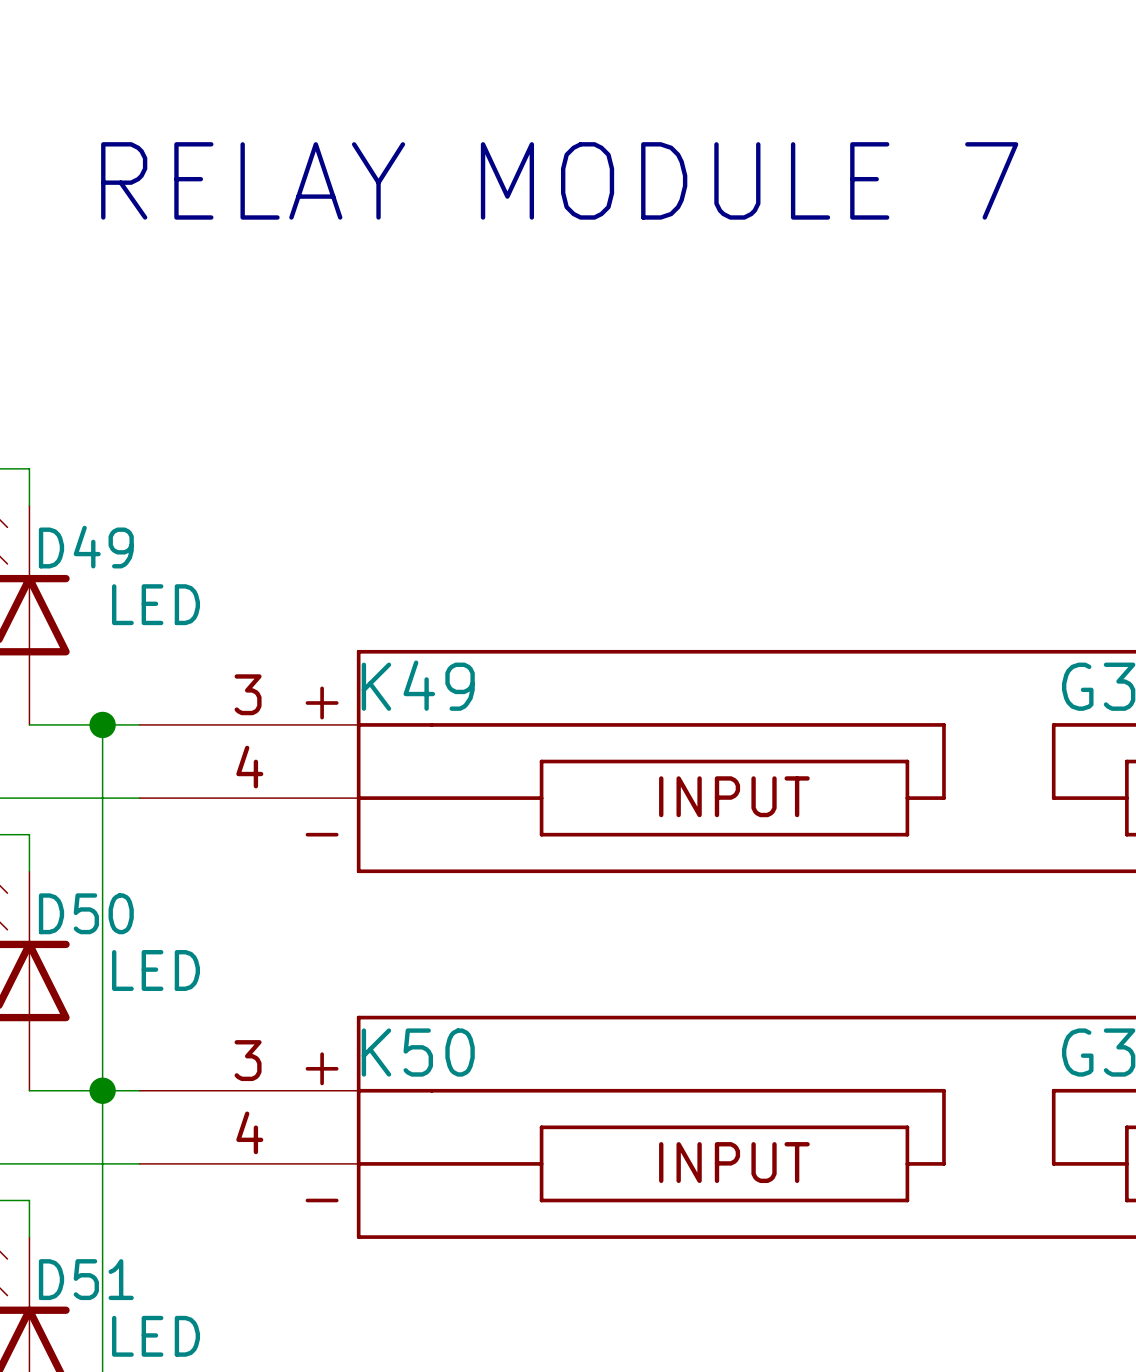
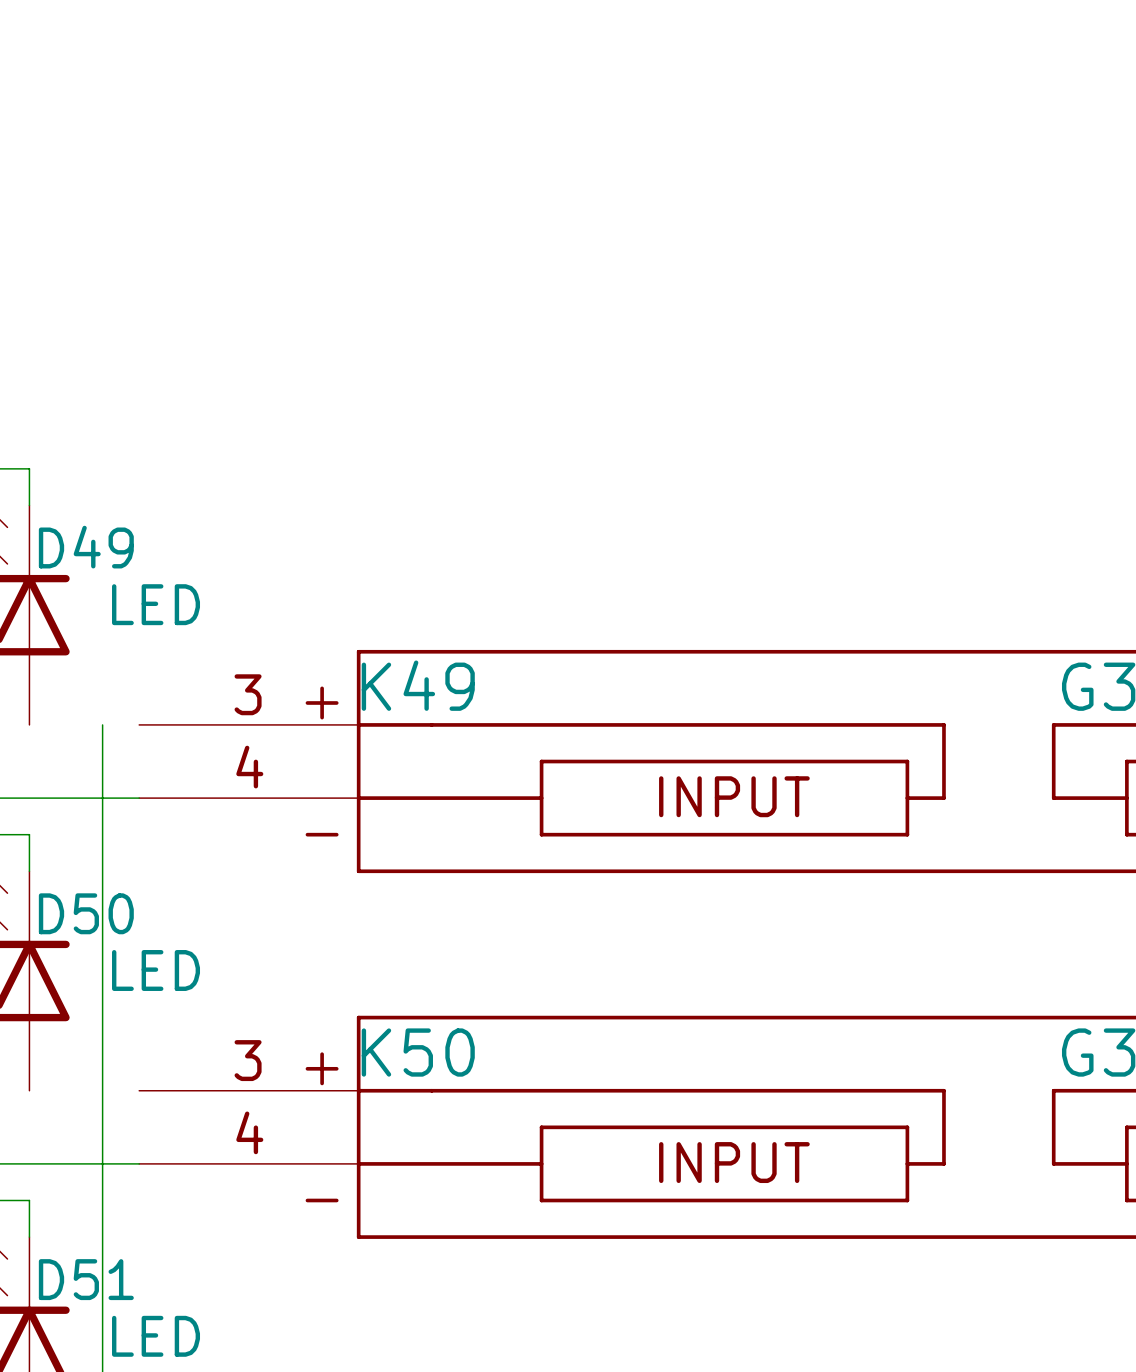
text: RELAY MODULE 7 (559, 180) -> none
wire: (29, 724) (139, 724) -> none
junction: (102, 724) -> none
wire: (29, 1090) (139, 1090) -> none
junction: (102, 1090) -> none

